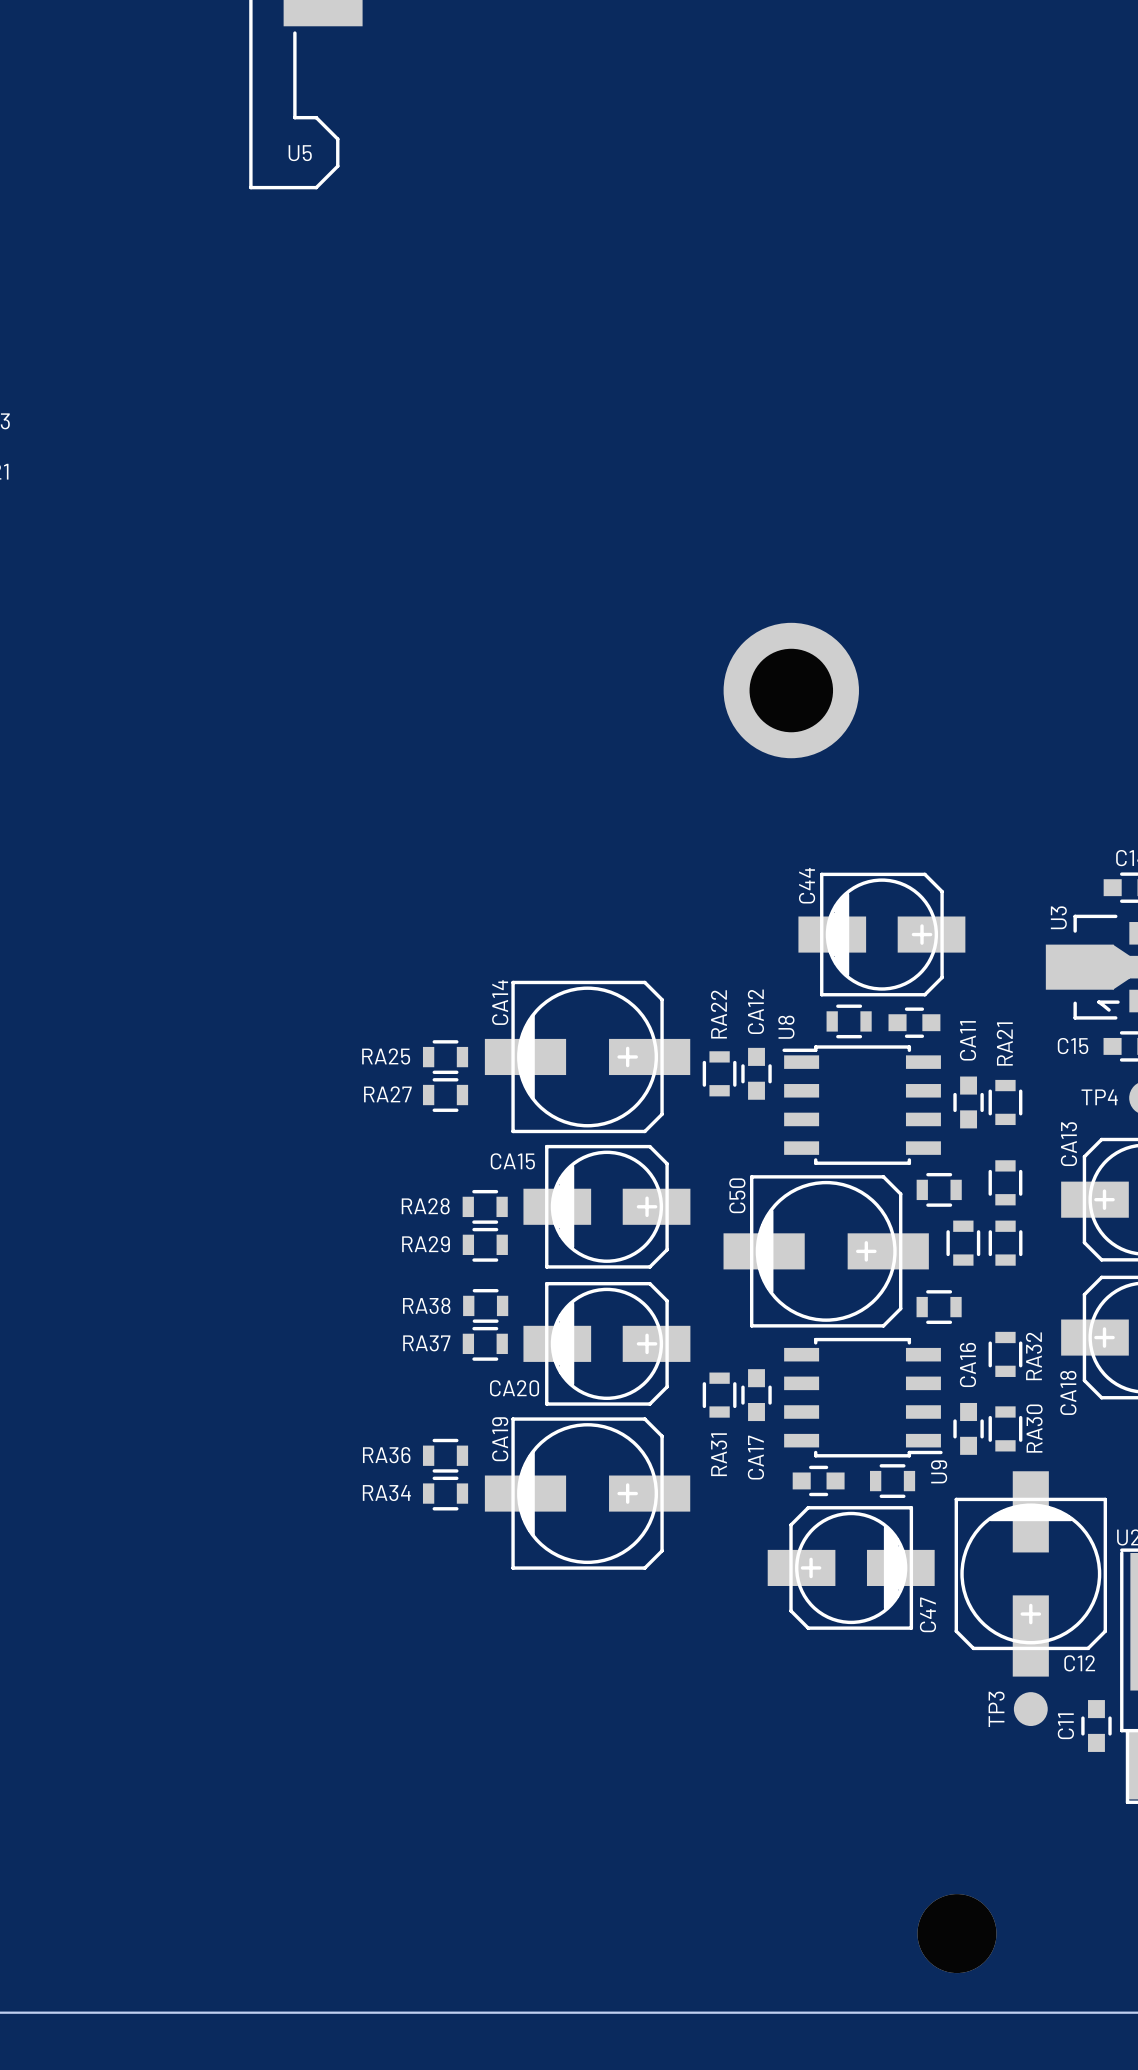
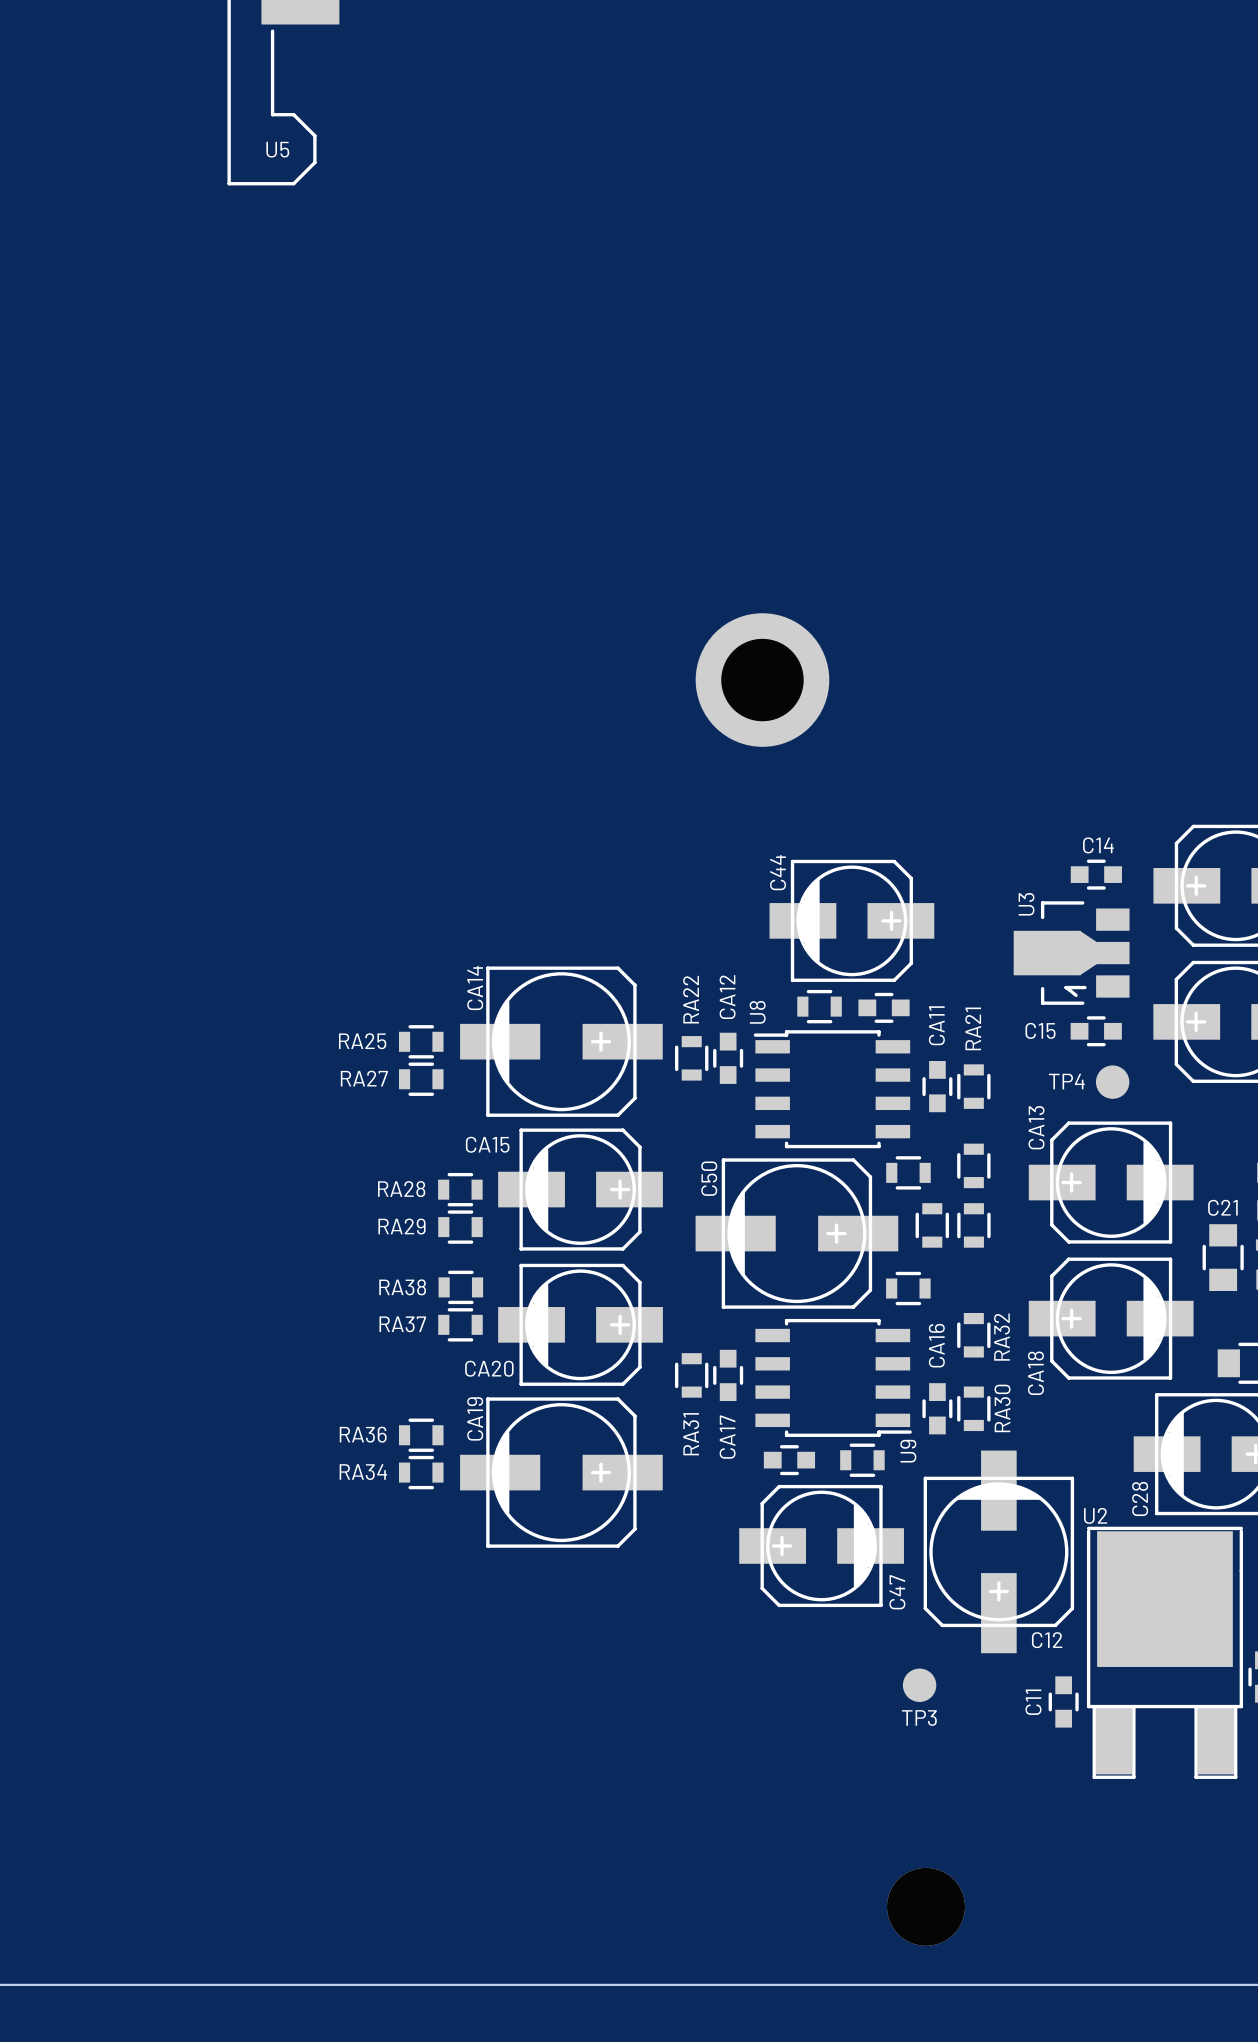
TP3 name rotation: 0° (996, 1709) -> 90° clockwise (919, 1718)
TP3 position: (1030, 1709) -> (919, 1685)

